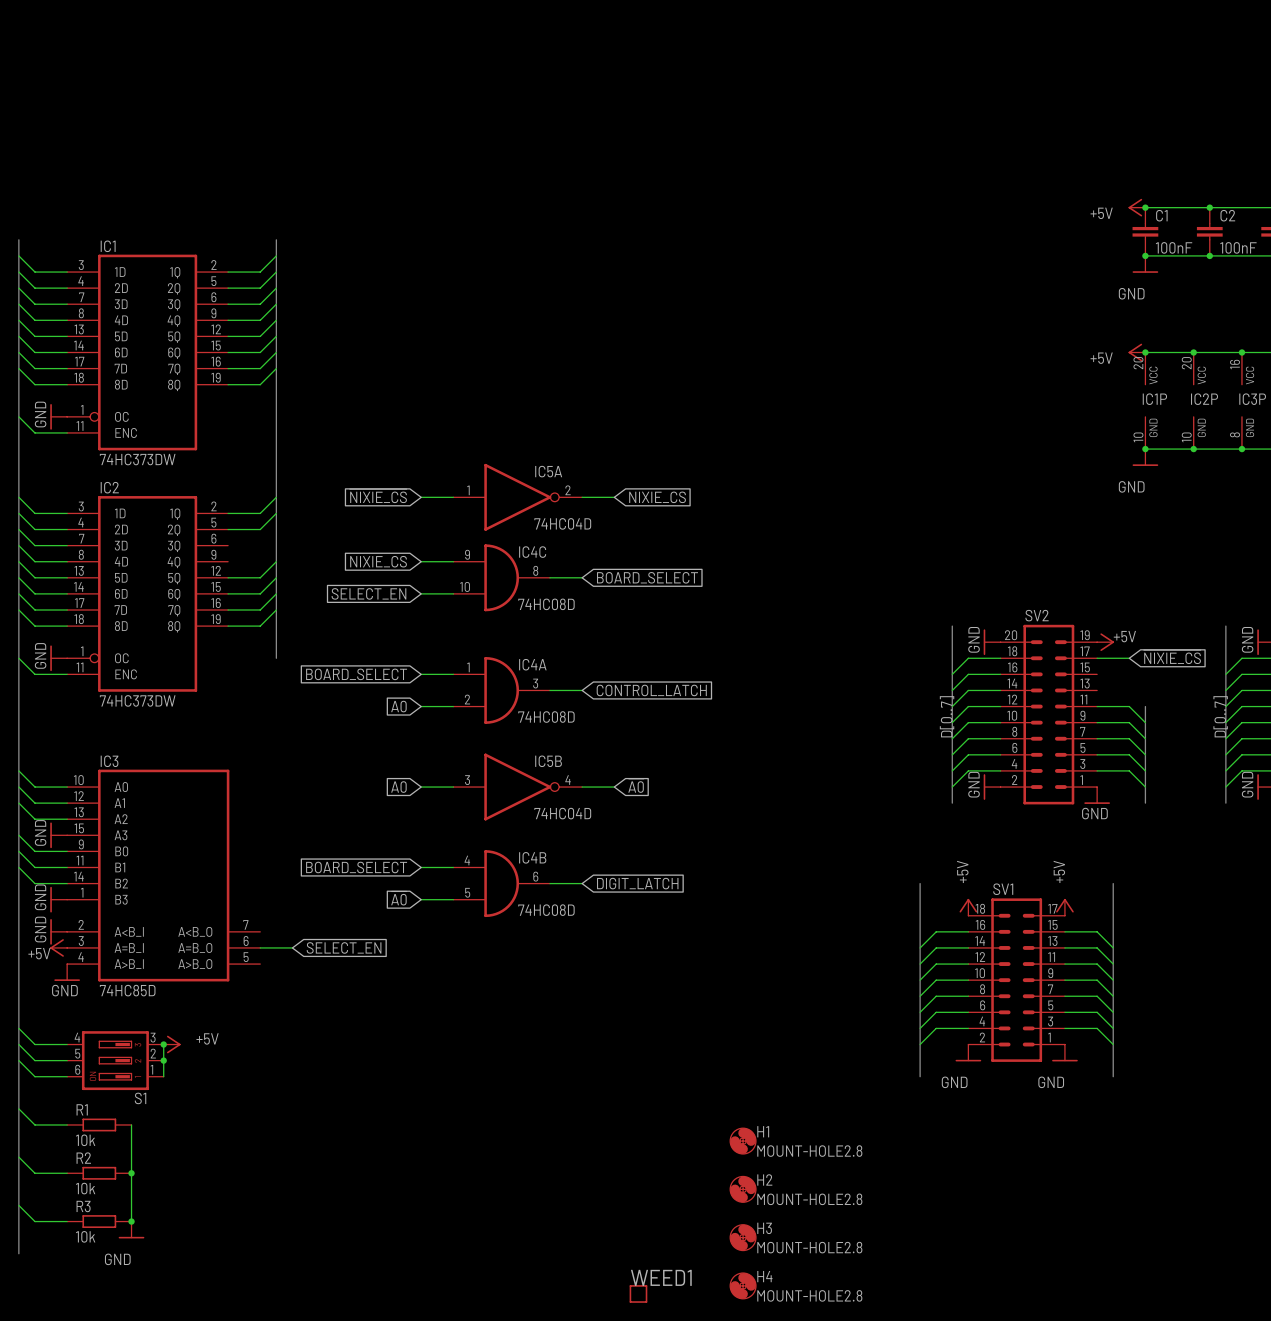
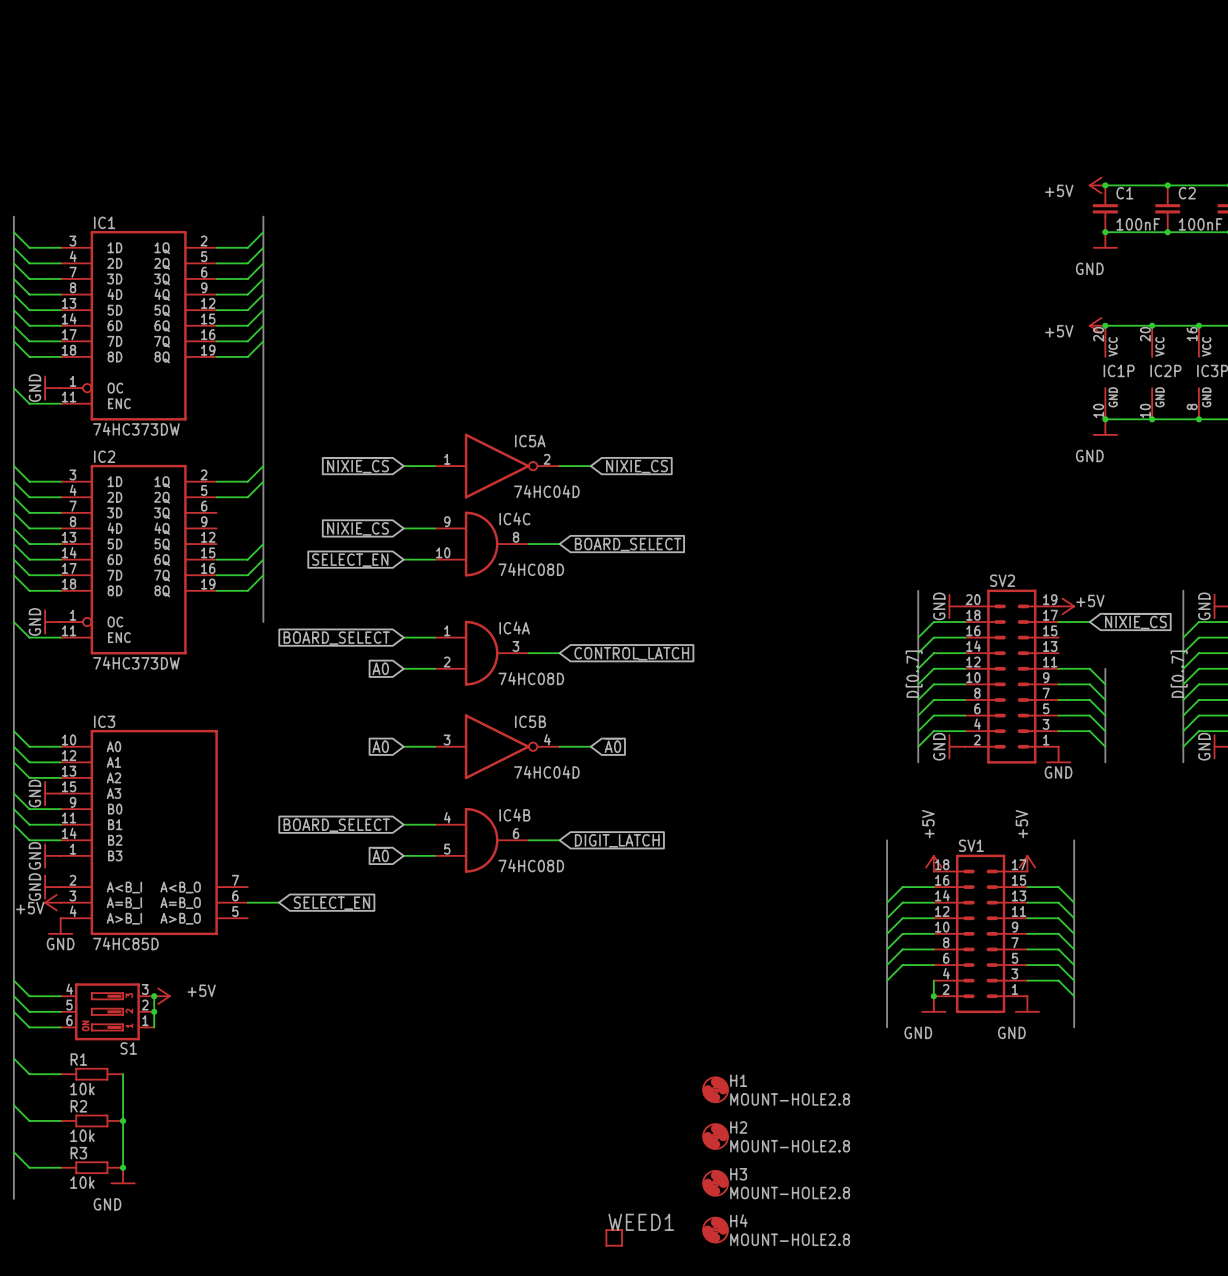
wire: (276, 561) (260, 577) (228, 577) -> none
wire: (968, 1028) (936, 1028) (920, 1044) -> (933, 980) (933, 996)
junction: none -> (933, 996)

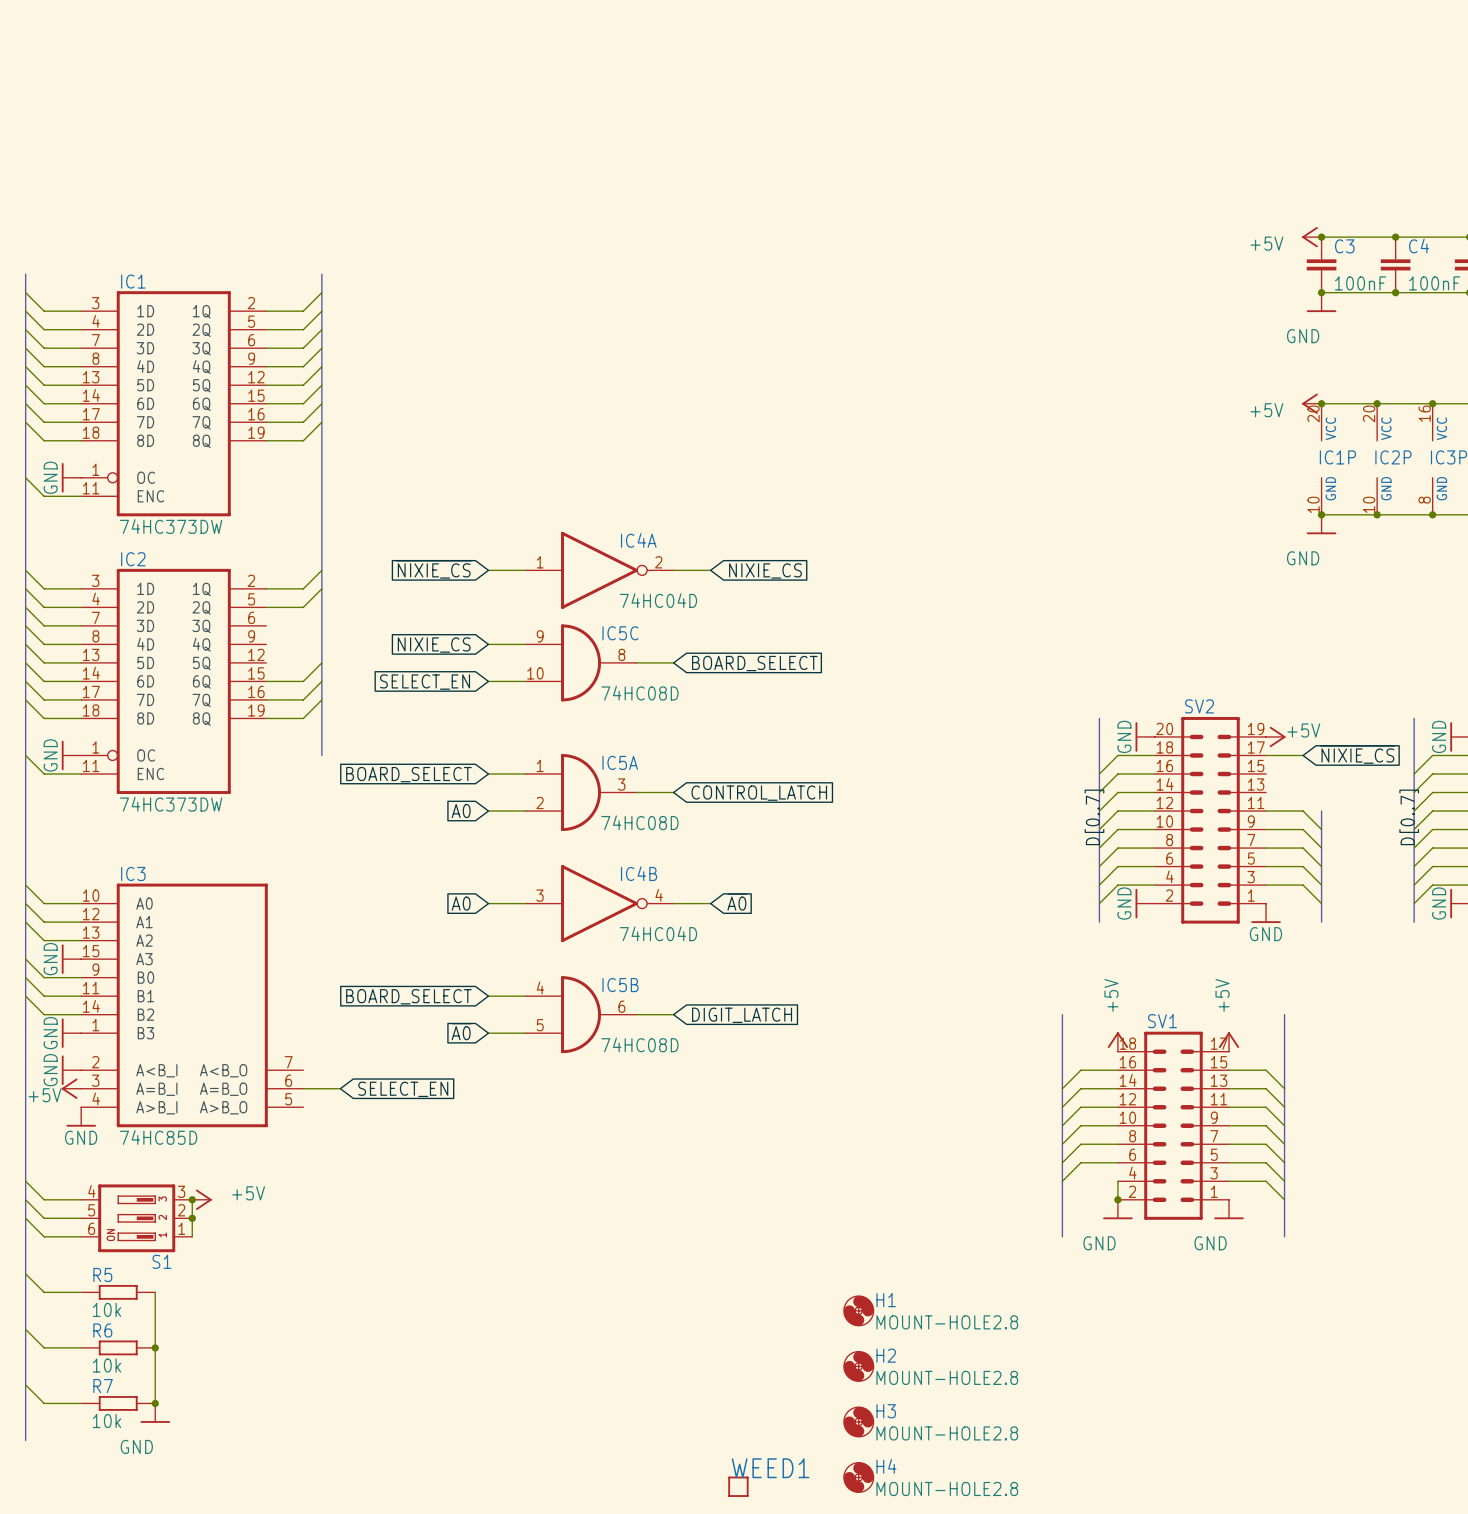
C1 name: C1 (1124, 193) -> C3 (1344, 246)
C2 name: C2 (1187, 193) -> C4 (1419, 246)
IC5A name: IC5A (530, 441) -> IC4A (638, 540)
IC4C name: IC4C (514, 518) -> IC5C (620, 633)
IC4A name: IC4A (514, 627) -> IC5A (620, 762)
IC5B name: IC5B (530, 721) -> IC4B (639, 873)
IC4B name: IC4B (514, 815) -> IC5B (620, 985)
R1 name: R1 (78, 1059) -> R5 (102, 1274)
R2 name: R2 (78, 1106) -> R6 (102, 1330)
R3 name: R3 (78, 1153) -> R7 (103, 1386)

